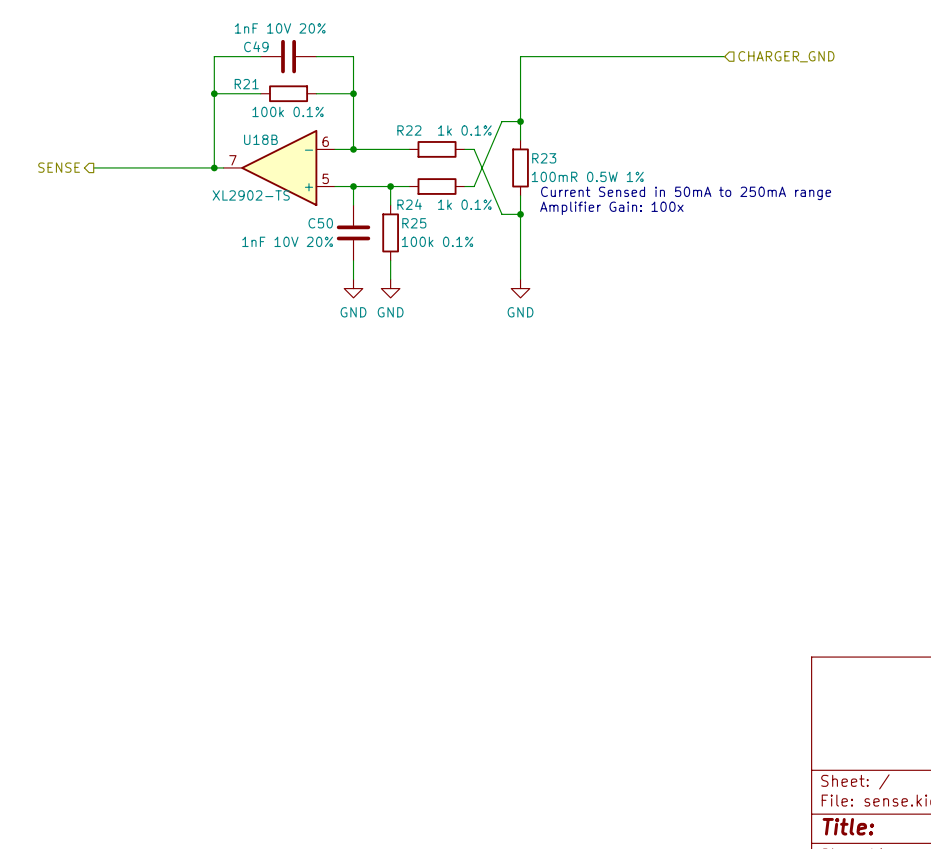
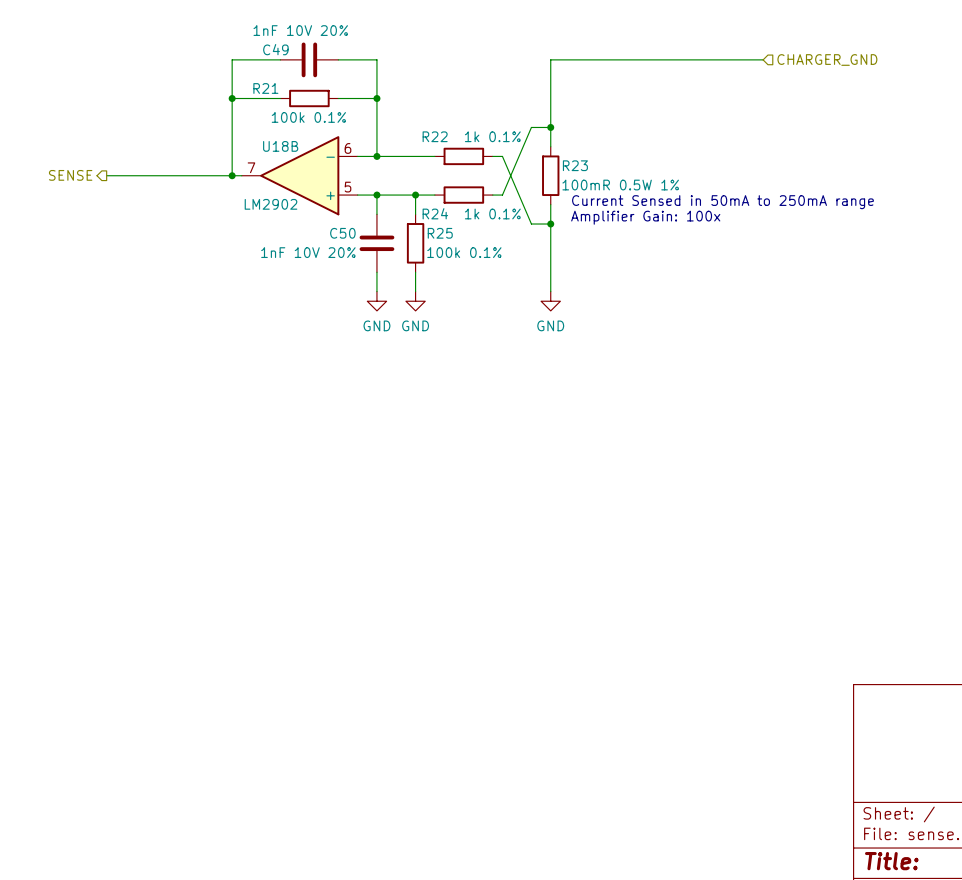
U18B value: XL2902-TS (251, 195) -> LM2902 (271, 204)

